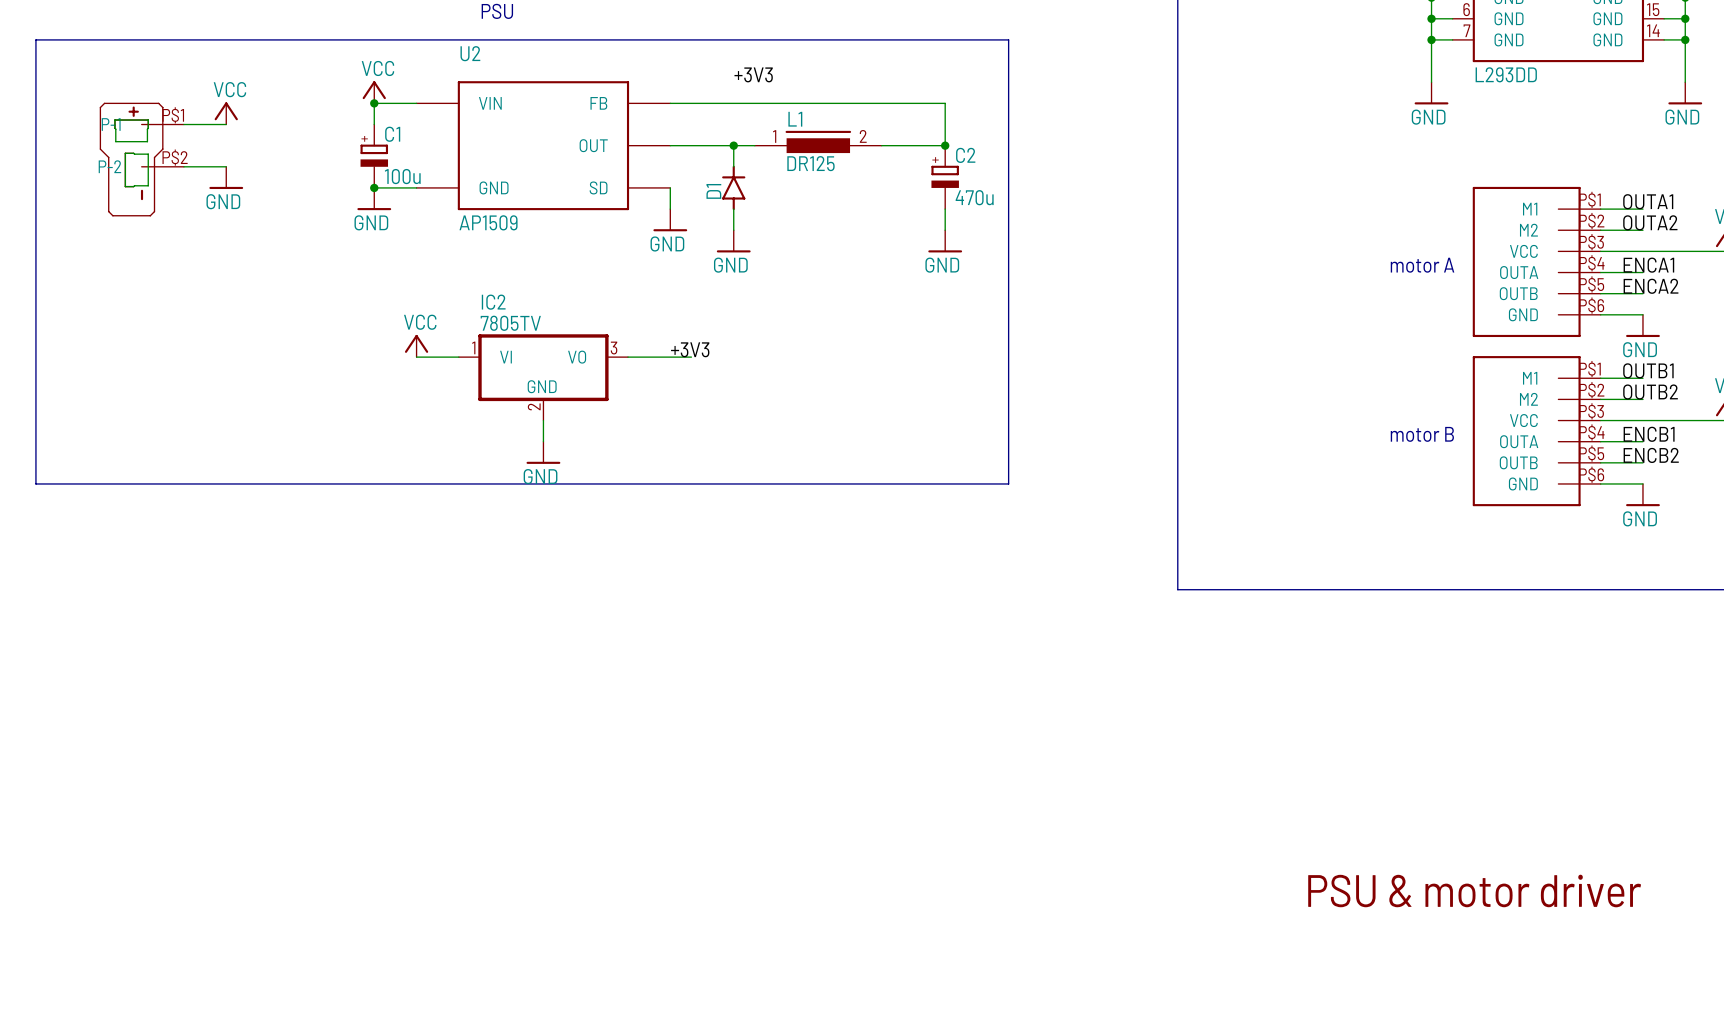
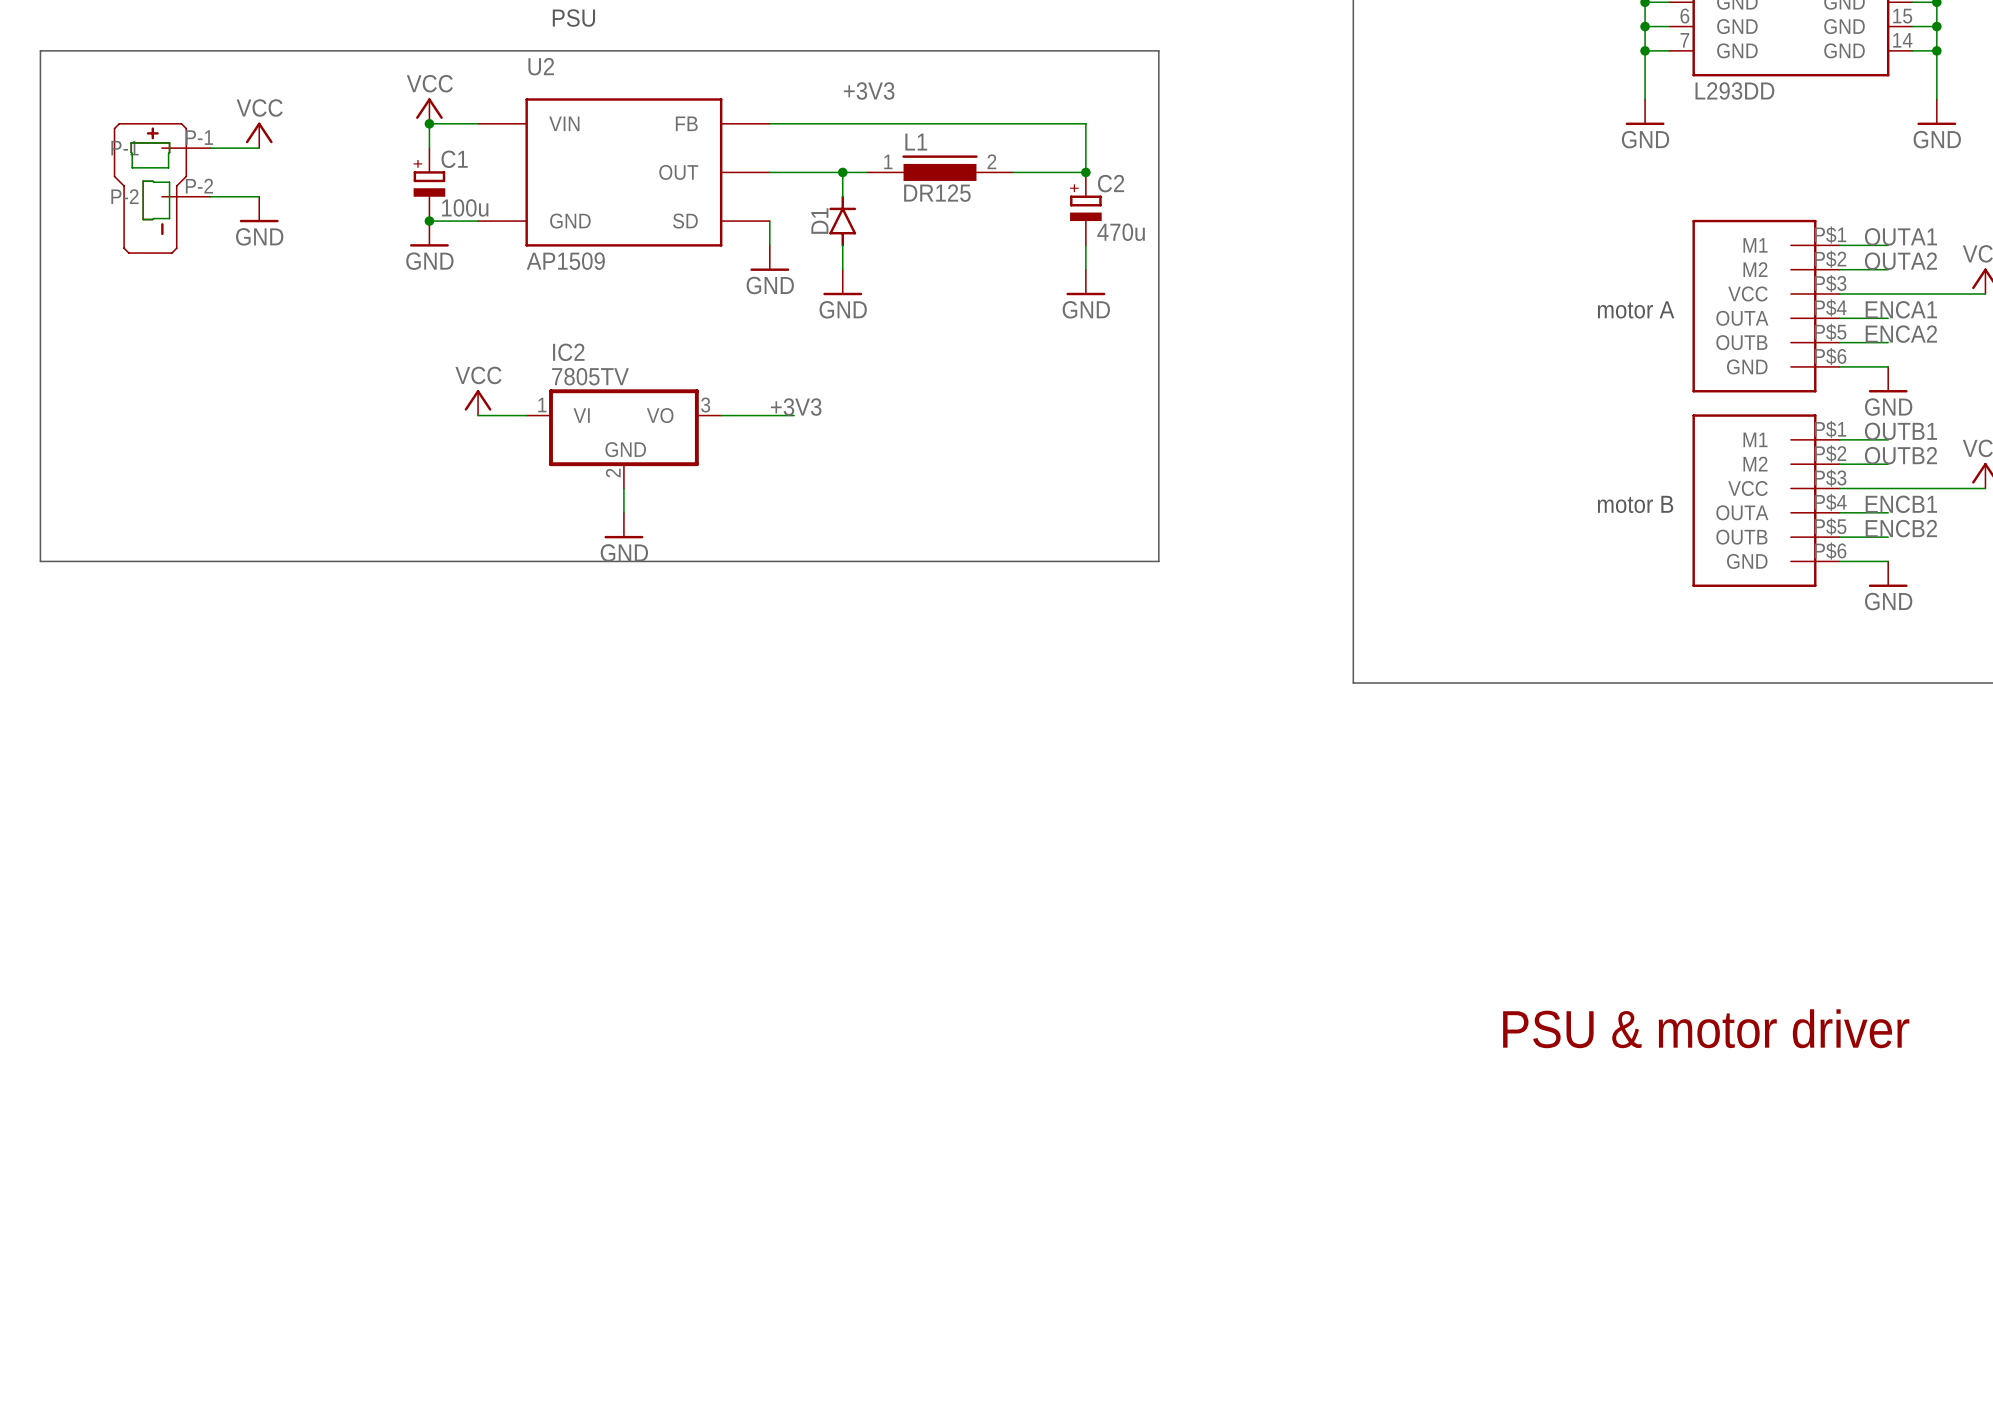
part pin number: P$1 (173, 115) -> P-1 (199, 137)
part pin number: P$2 (175, 157) -> P-2 (199, 186)

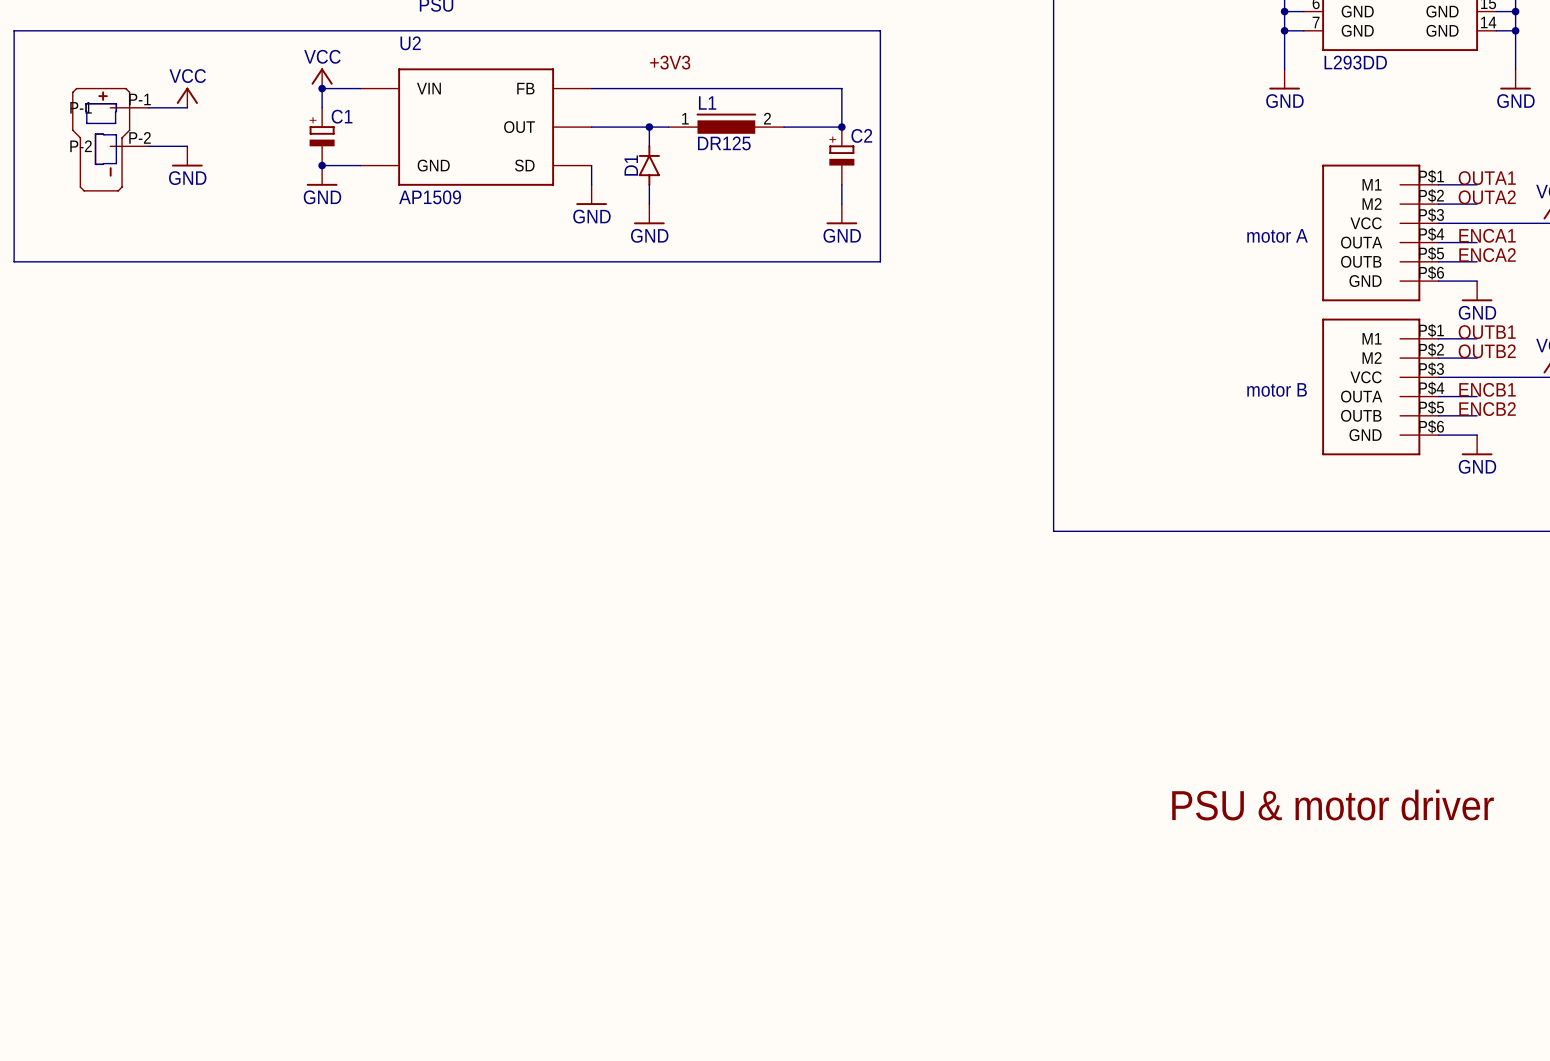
line: (1134, 50) (1158, 50) (1158, 561) (40, 561) (40, 342) -> (880, 30) (880, 261) (14, 261)
C1 value: 100u (465, 207) -> none
C2 value: 470u (1121, 232) -> none
power symbol: VCC (478, 402) -> none
label: +3V3 (796, 407) -> none
wire: (478, 415) (526, 415) -> none
wire: (721, 415) (794, 415) -> none
IC2: 7805TV (623, 438) -> none
wire: (623, 488) (623, 512) -> none
power symbol: GND (623, 525) -> none

